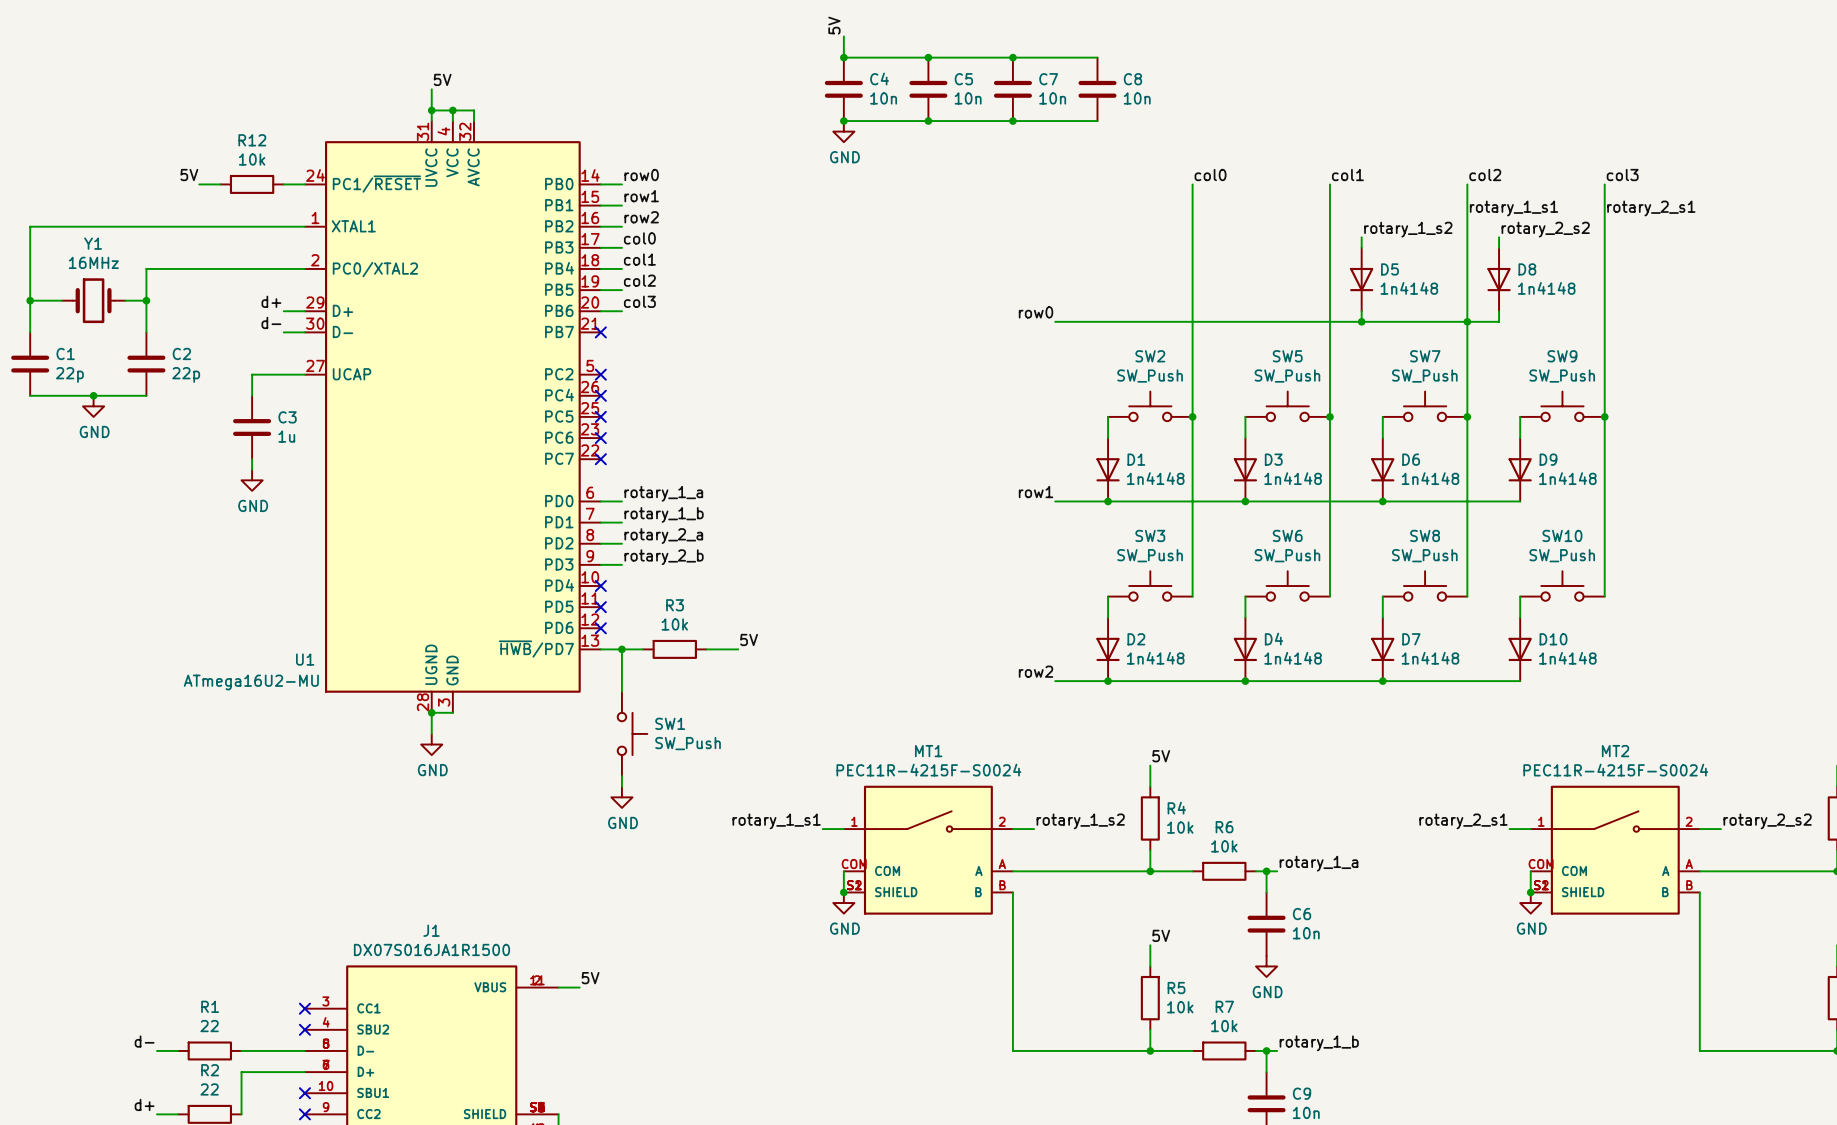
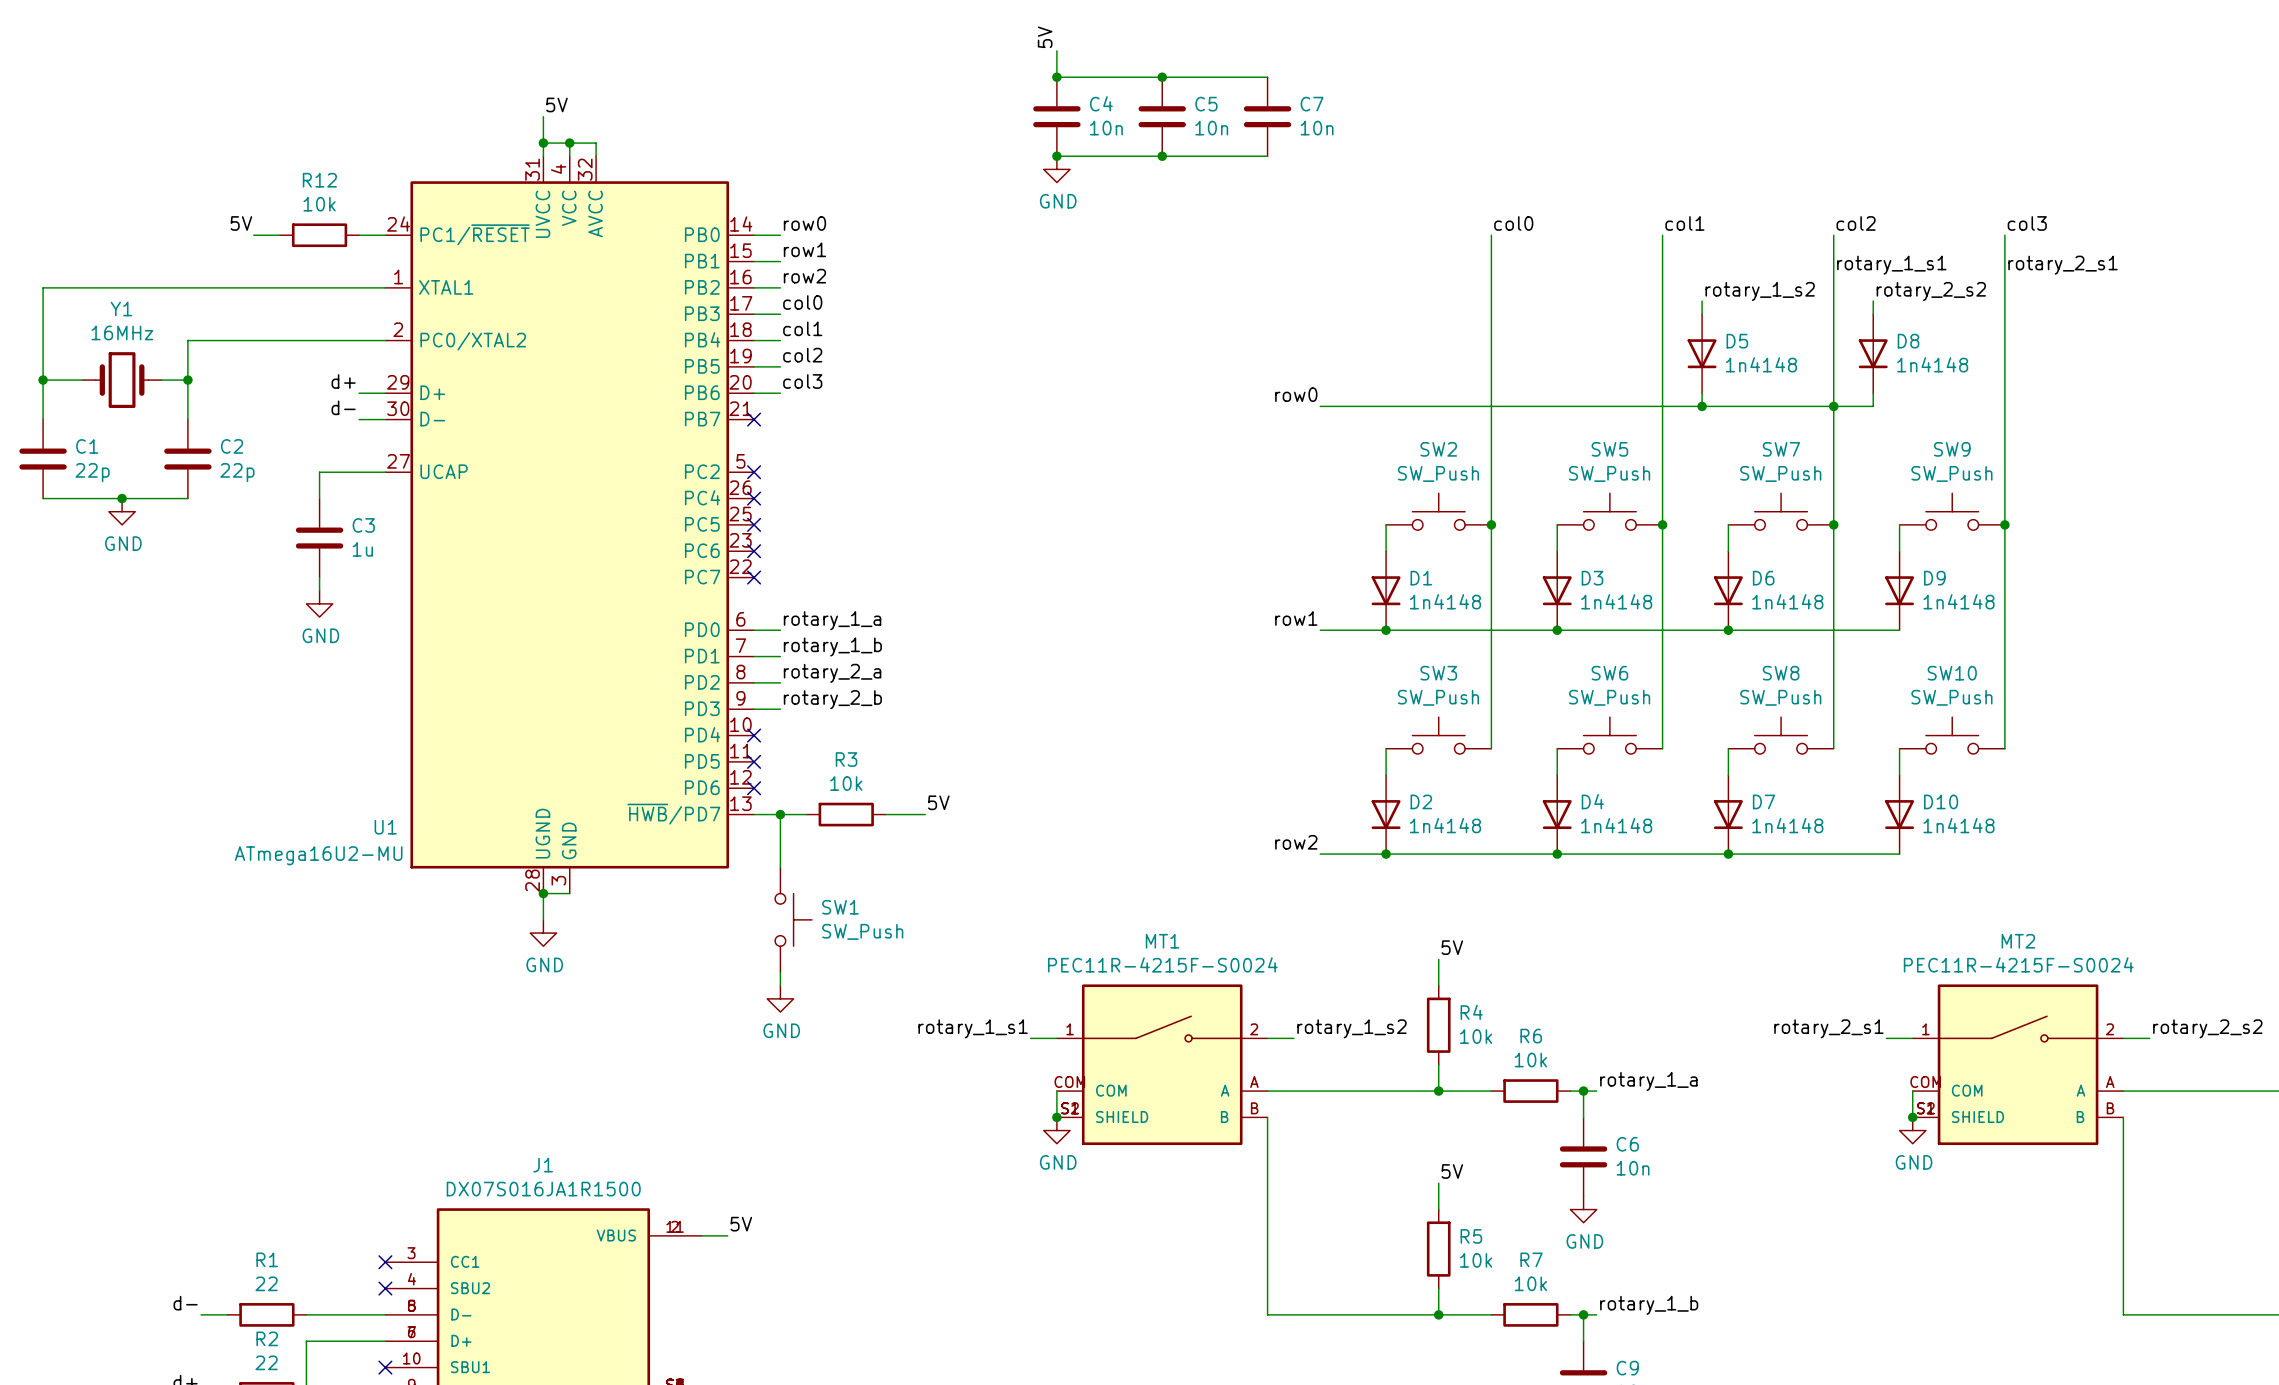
wire: (1012, 57) (1097, 57) -> none
junction: (1012, 57) -> none
C8: 10n (1097, 89) -> none
wire: (1012, 121) (1097, 121) -> none
junction: (1012, 121) -> none

